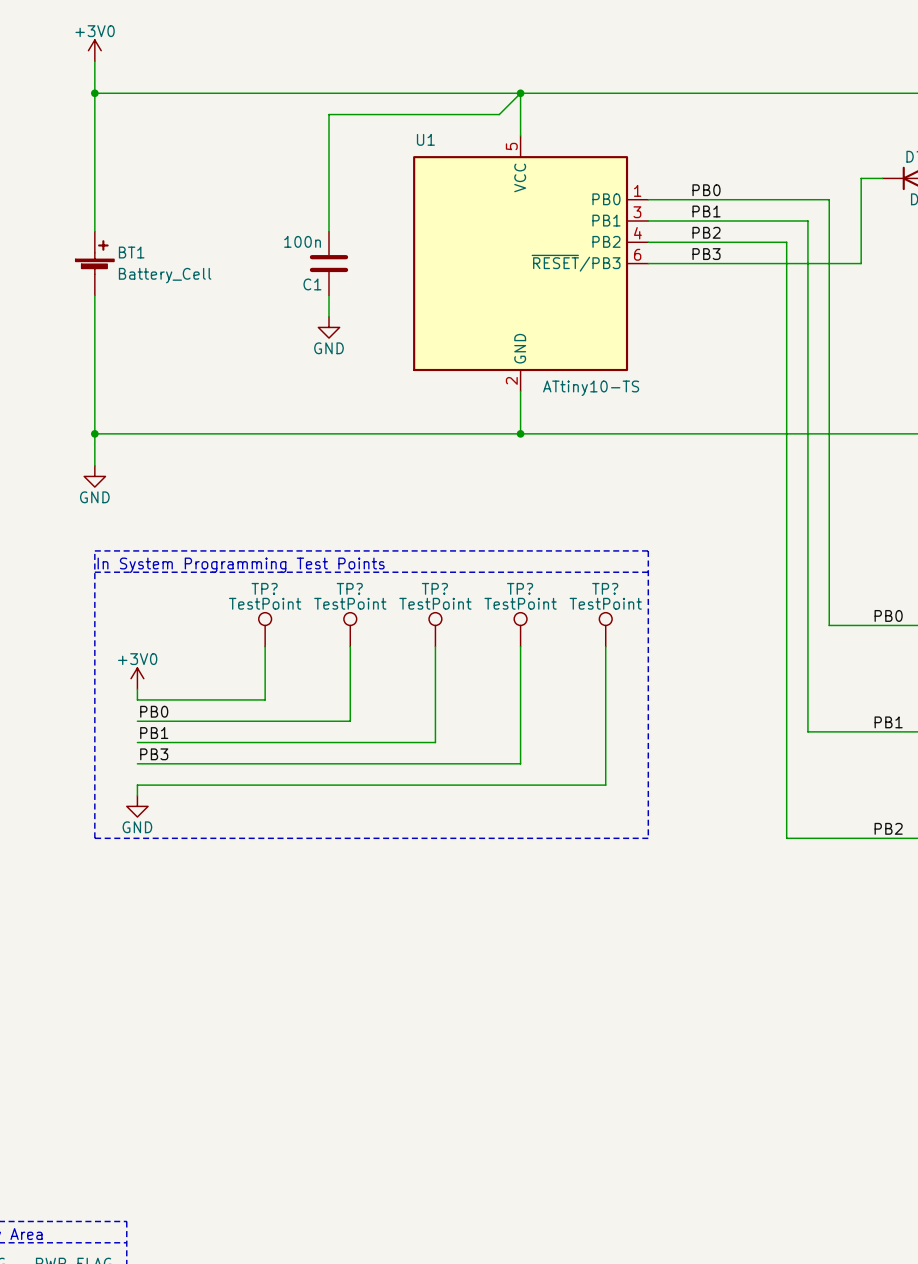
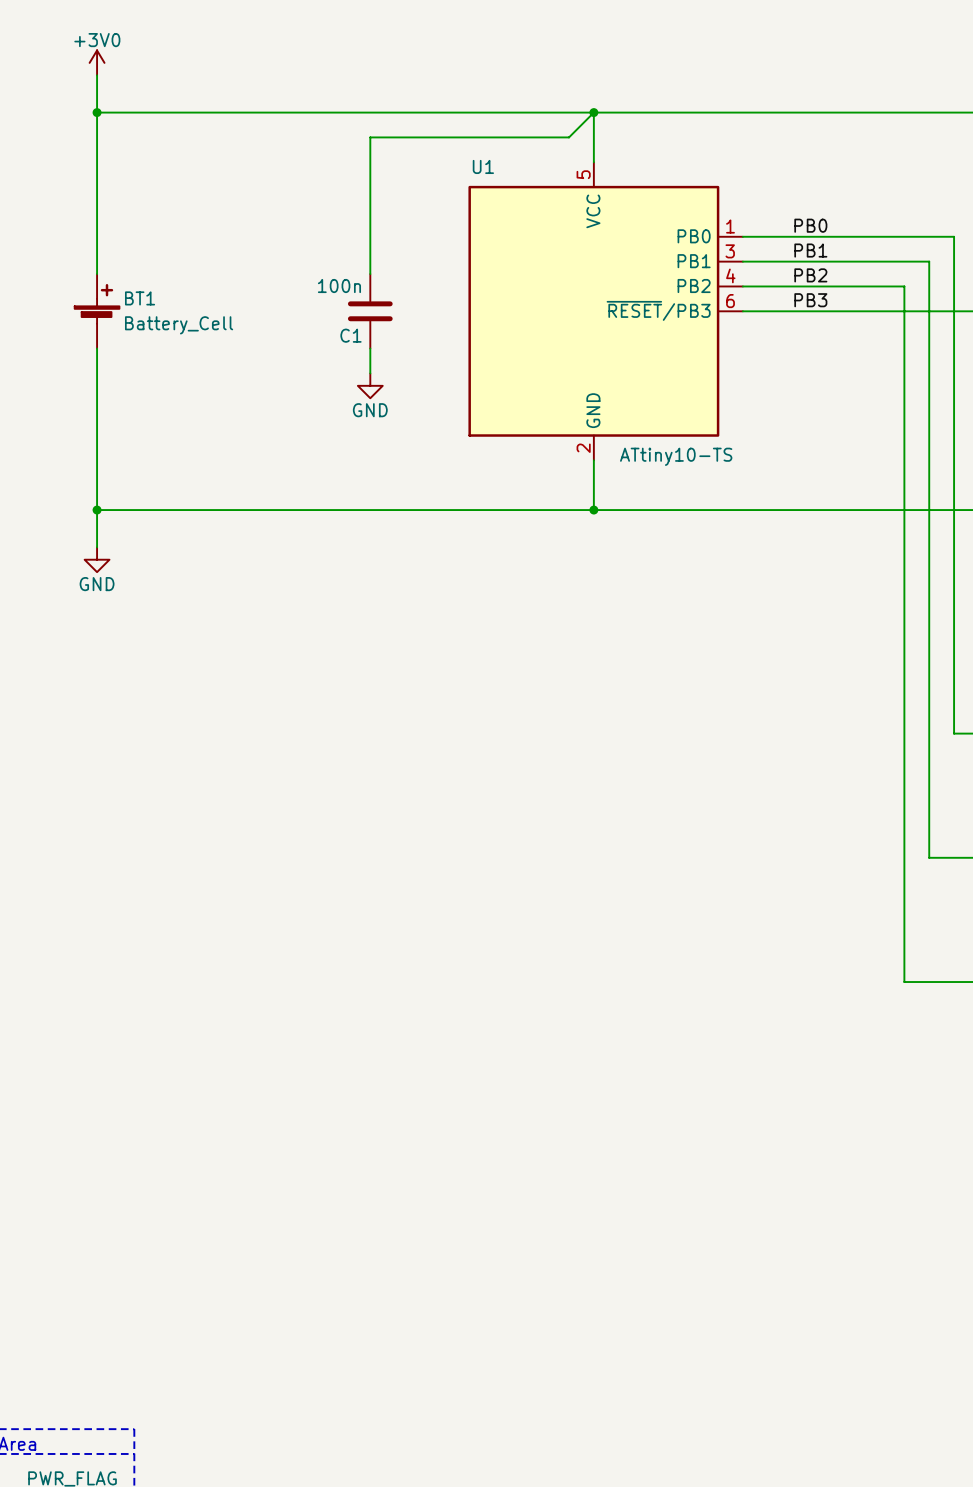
line: (94, 550) (94, 838) (648, 838) (648, 550) (94, 550) -> none
text: In System Programming Test Points (241, 565) -> none
line: (94, 572) (648, 572) -> none
TP?: TestPoint (265, 629) -> none
TP?: TestPoint (350, 629) -> none
TP?: TestPoint (435, 629) -> none
TP?: TestPoint (520, 629) -> none
TP?: TestPoint (605, 629) -> none
wire: (265, 646) (265, 699) (137, 699) (137, 689) -> none
wire: (350, 646) (350, 721) (137, 721) -> none
wire: (435, 646) (435, 742) (137, 742) -> none
wire: (520, 646) (520, 763) (137, 763) -> none
wire: (605, 646) (605, 785) (137, 785) (137, 795) -> none
power symbol: +3V0 (137, 678) -> none
label: PB0 (154, 711) -> none
label: PB1 (154, 733) -> none
label: PB3 (154, 754) -> none
power symbol: GND (137, 806) -> none

